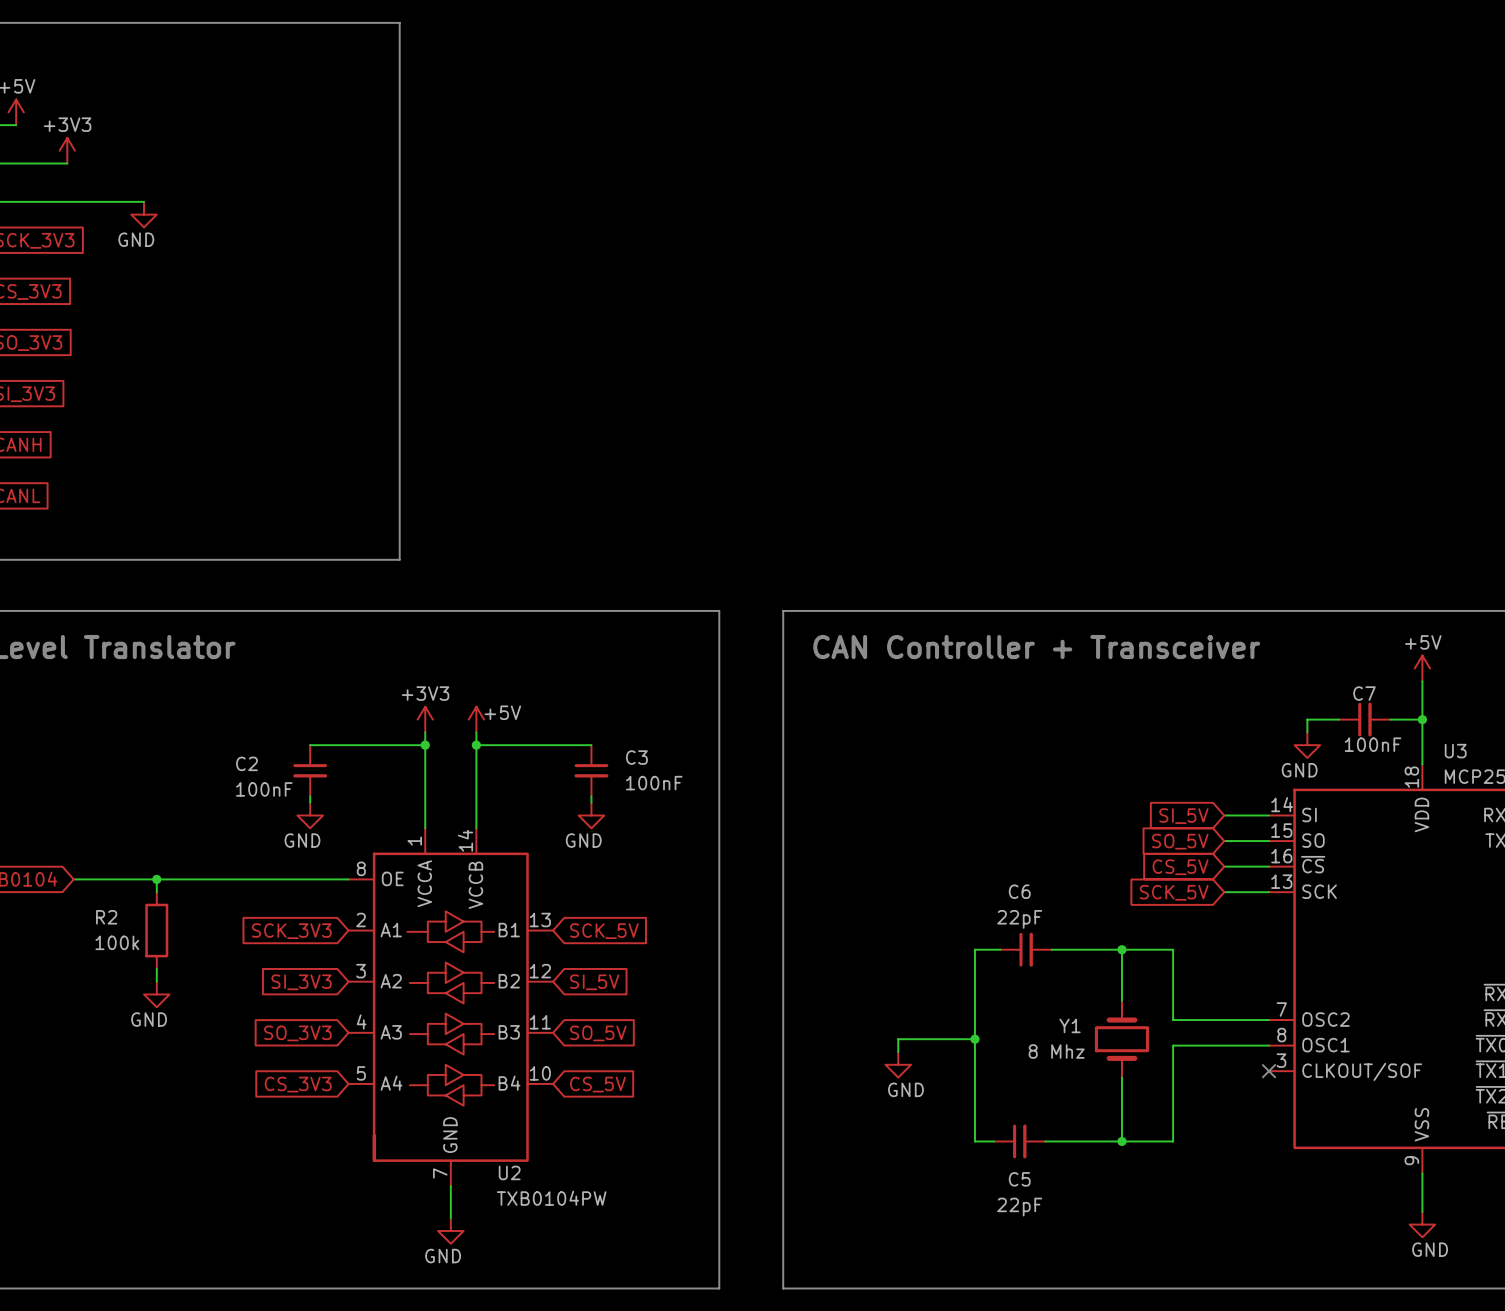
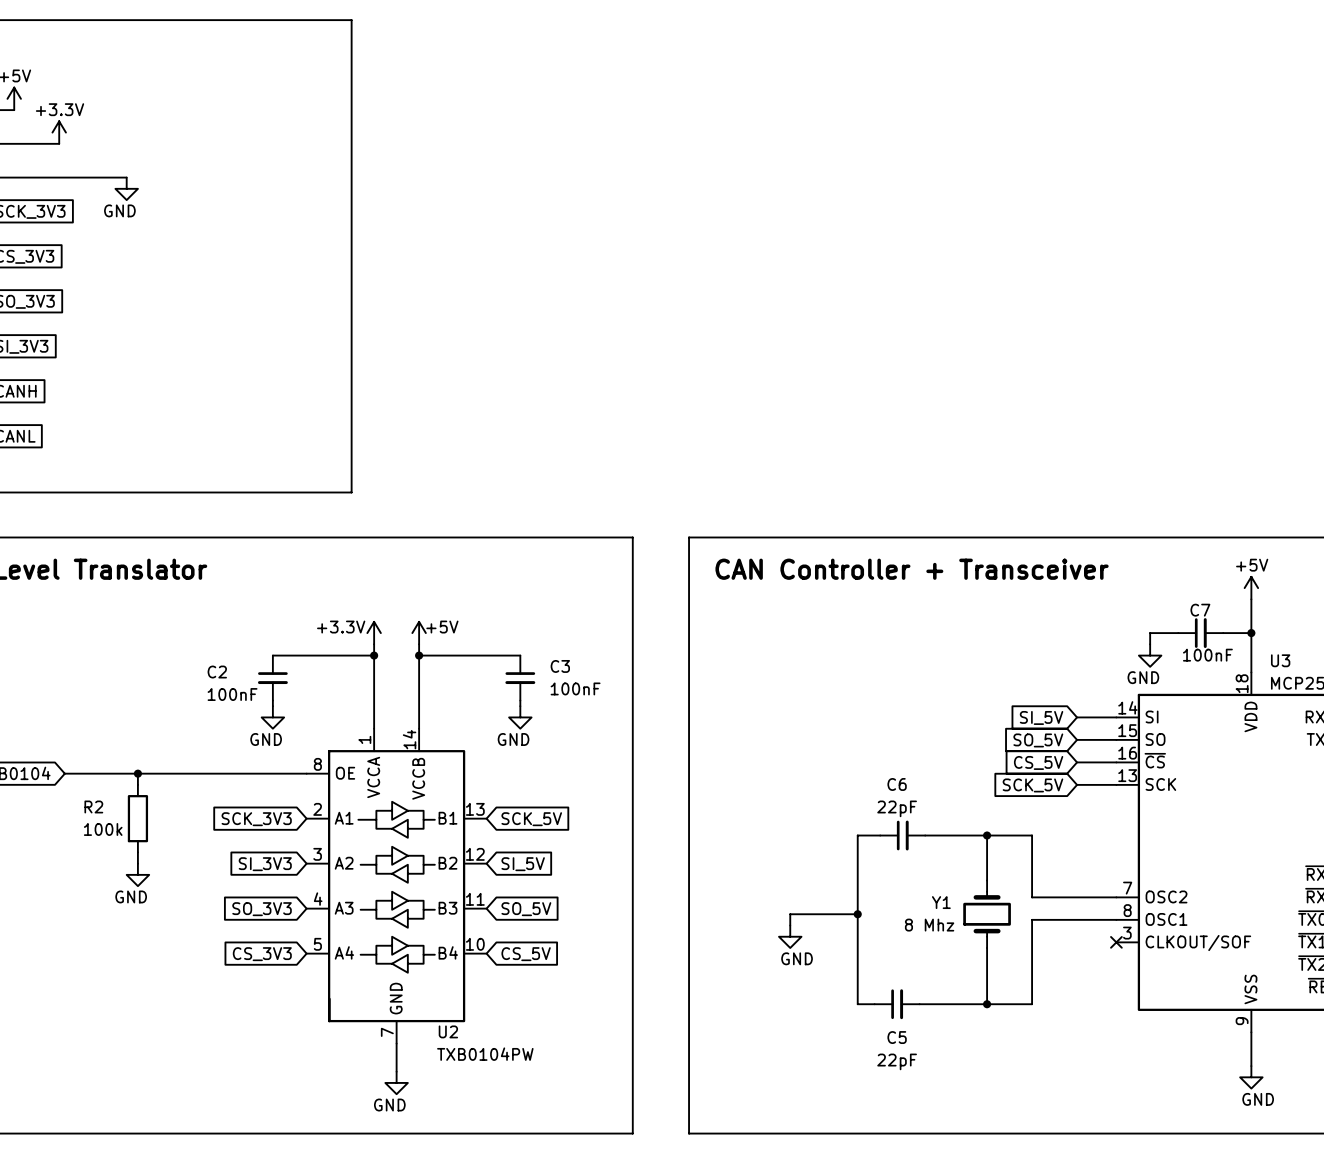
power symbol: +3V3 (67, 150) -> +3.3V (59, 132)
power symbol: +3V3 (425, 719) -> +3.3V (374, 633)

